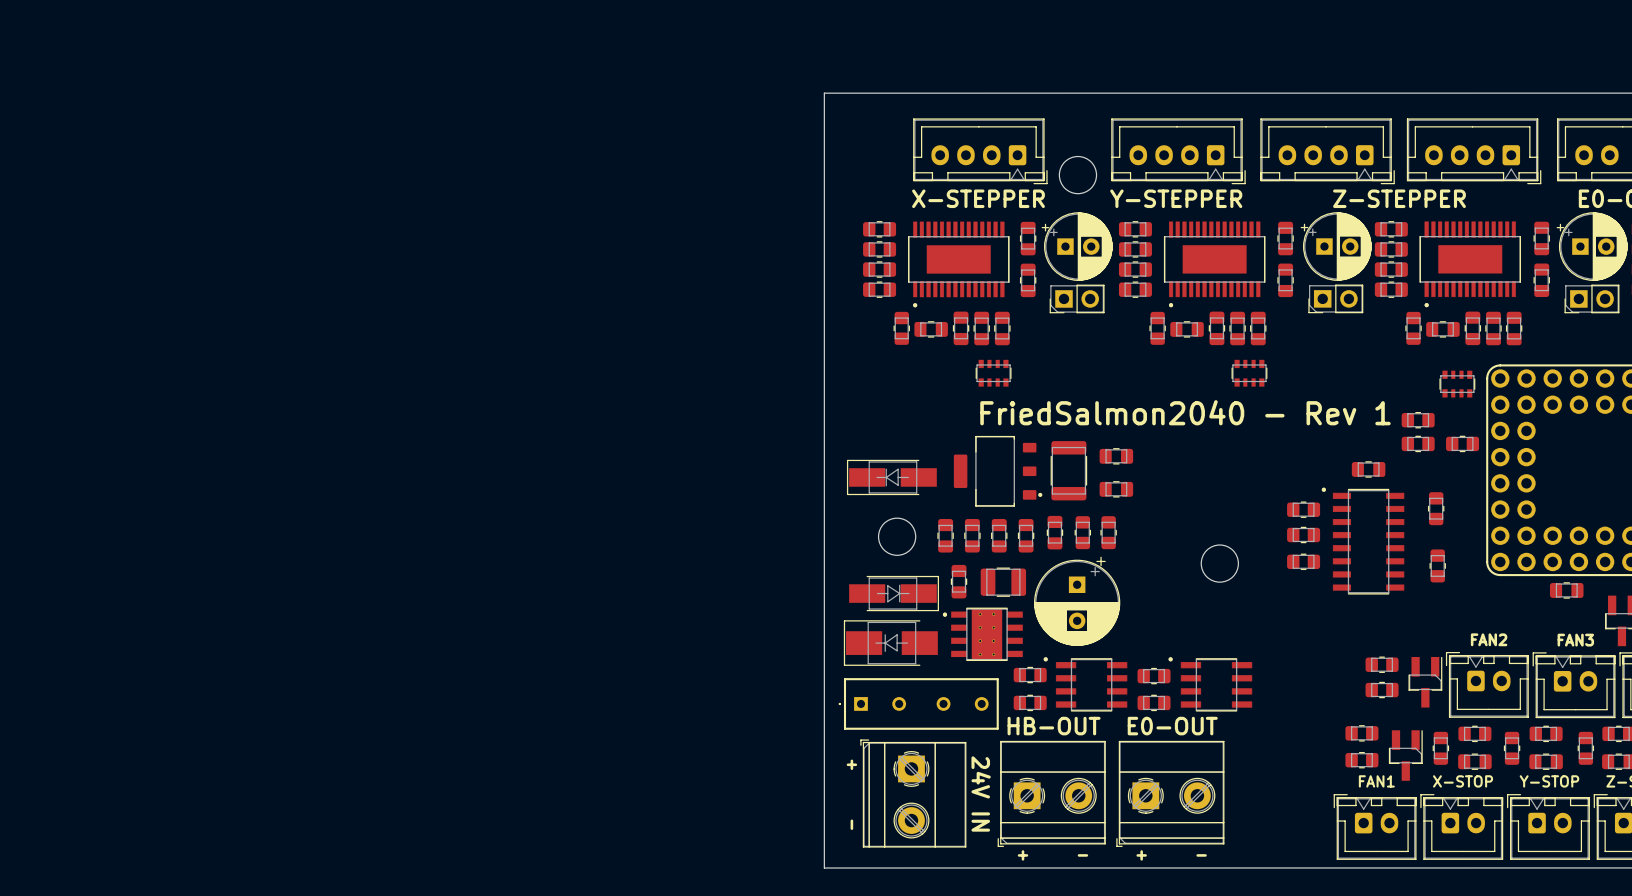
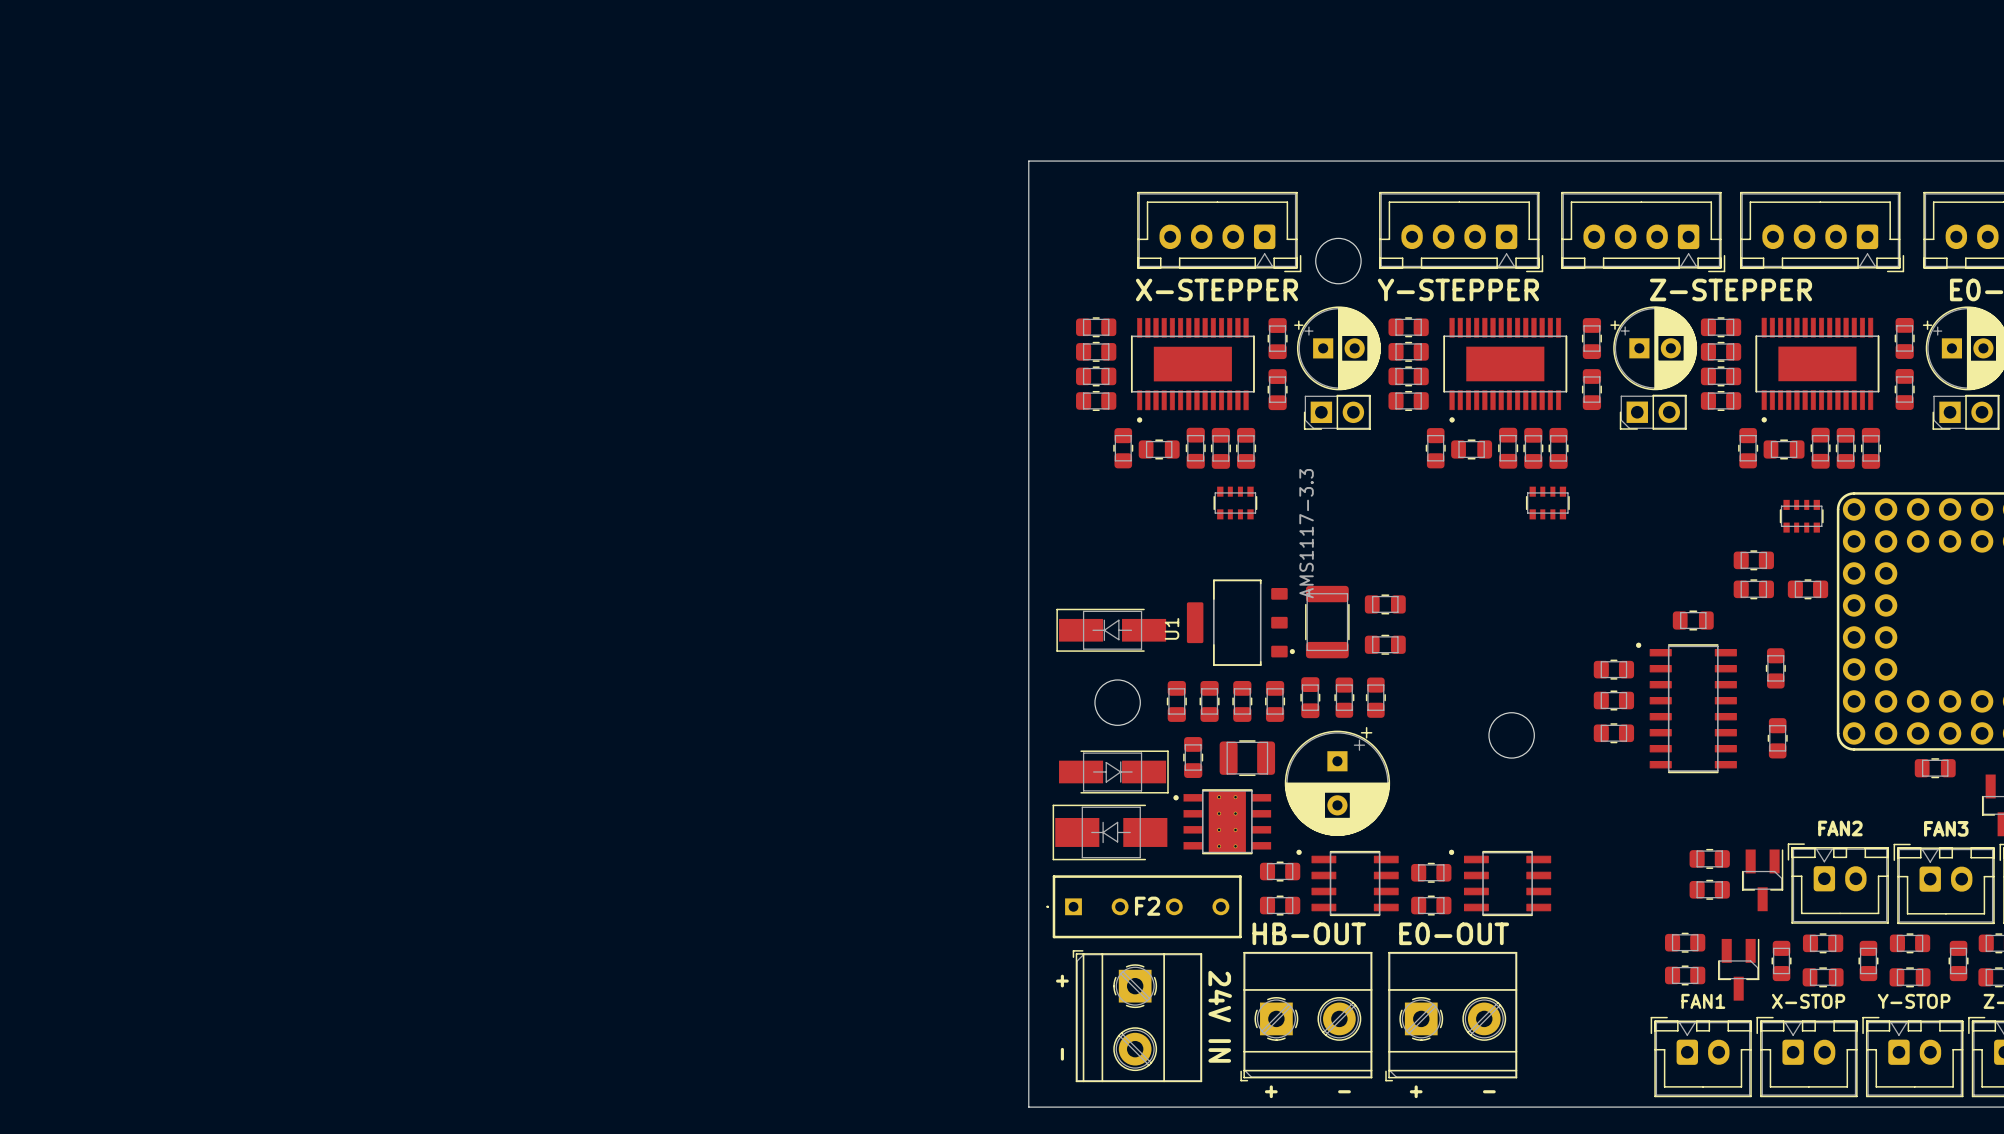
U1 value: none -> AMS1117-3.3 (1306, 533)
text: FriedSalmon2040 - Rev 1 (1185, 412) -> none
U1 name: none -> U1 (1172, 628)
F2 name: none -> F2 (1147, 906)

